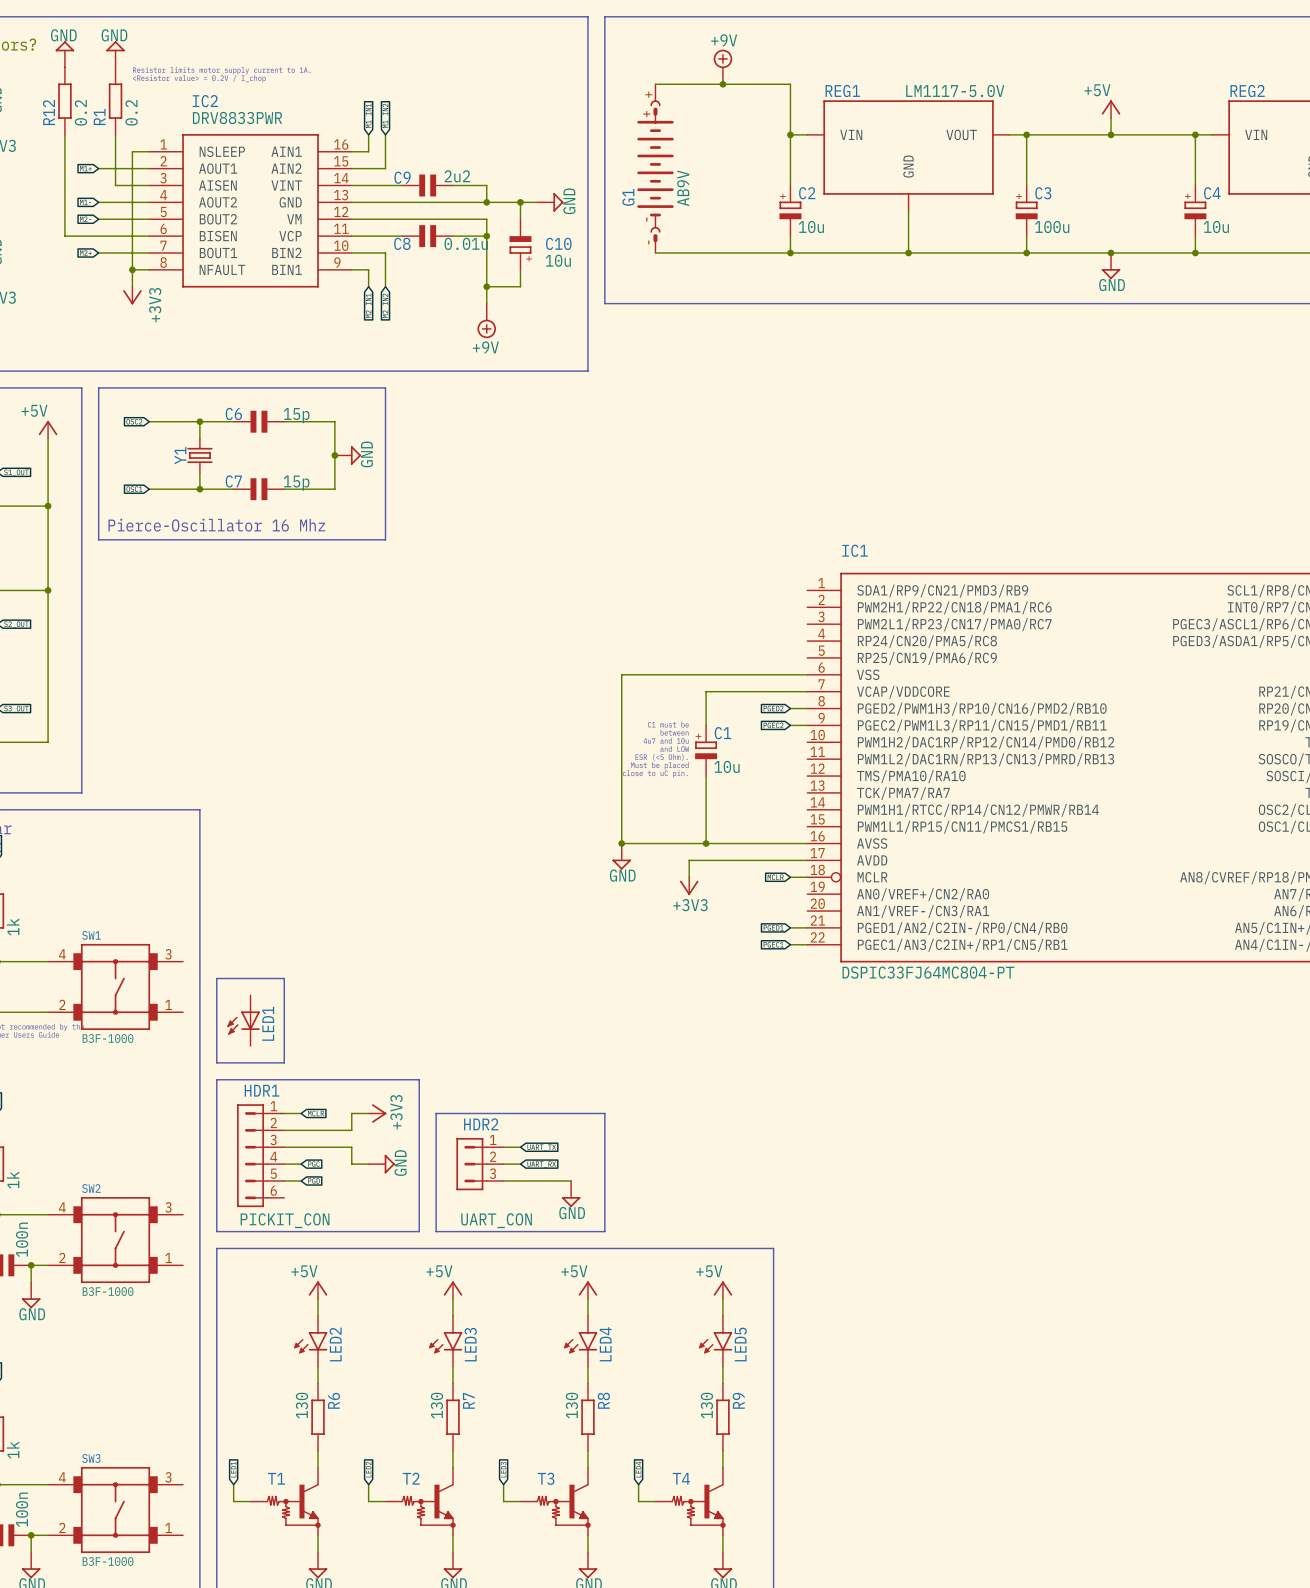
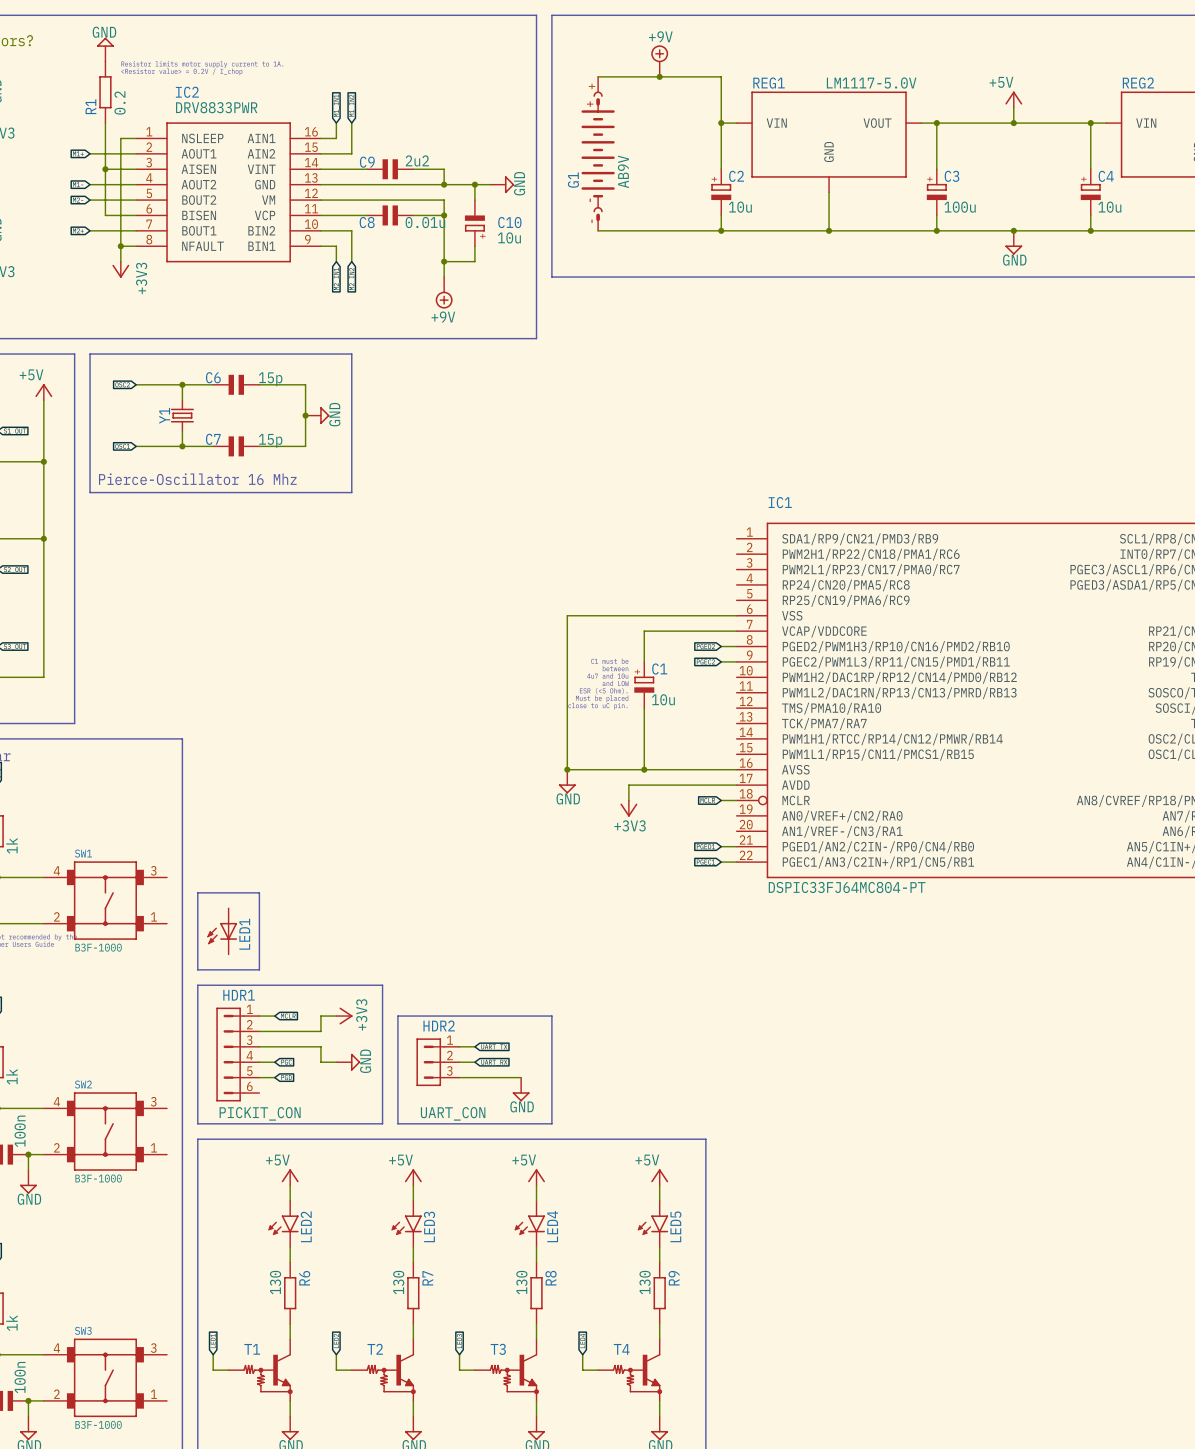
power symbol: GND (64, 54) -> none
R12: 0.2 (64, 101) -> none
wire: (64, 134) (64, 236) (115, 236) -> (105, 169) (105, 215)
junction: none -> (105, 169)

